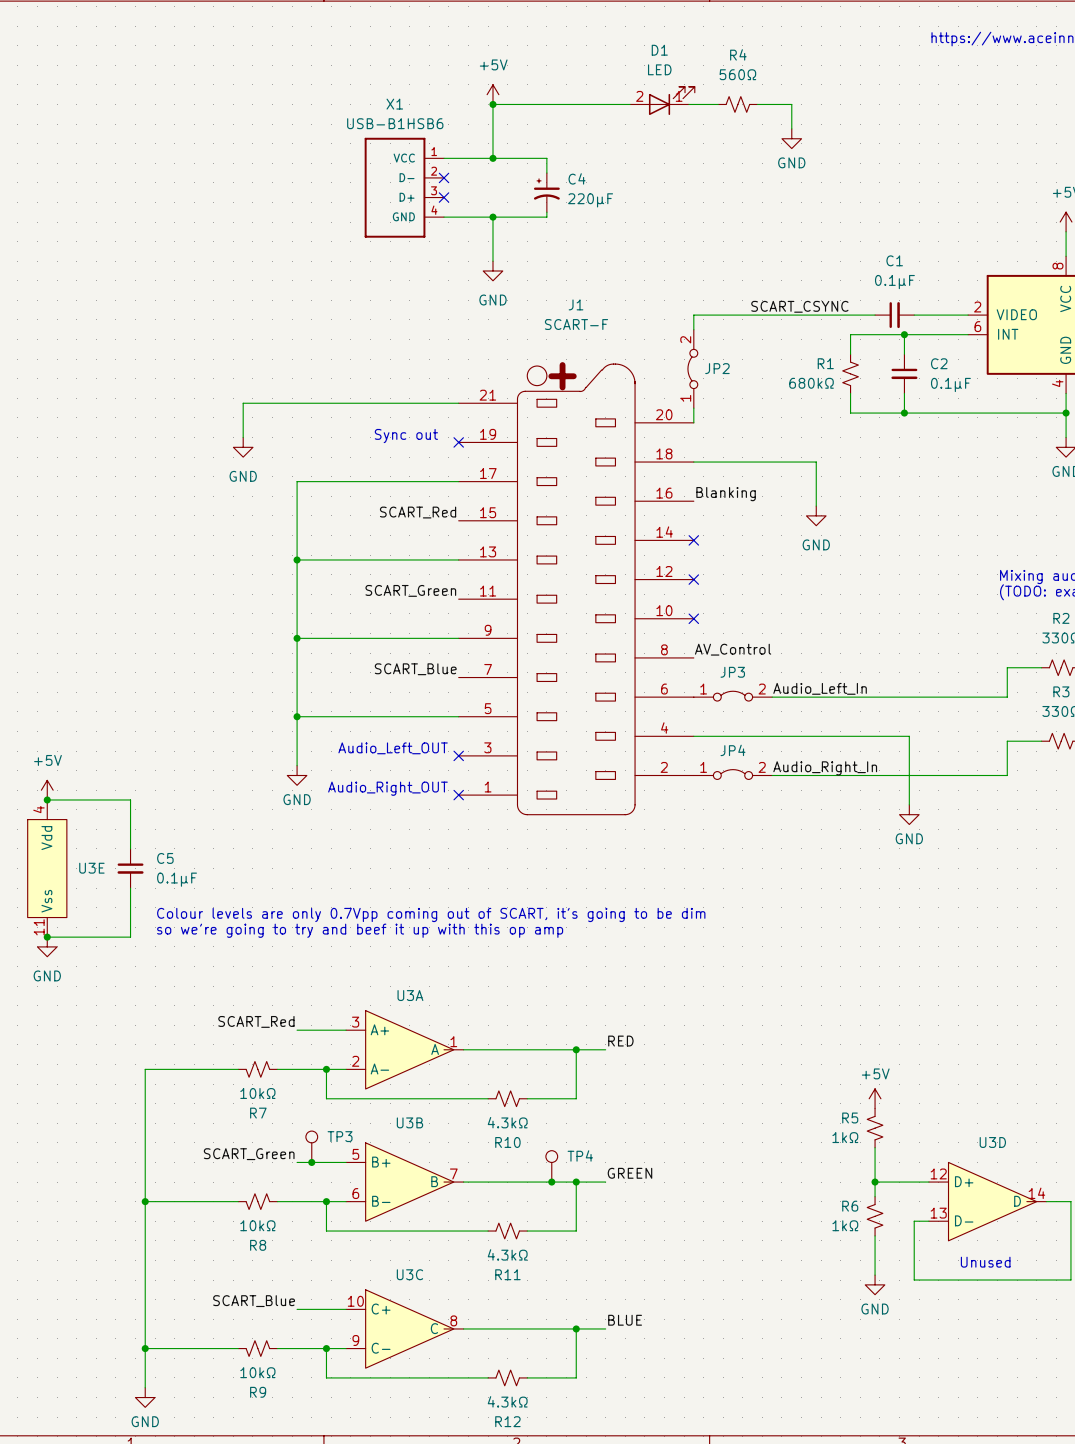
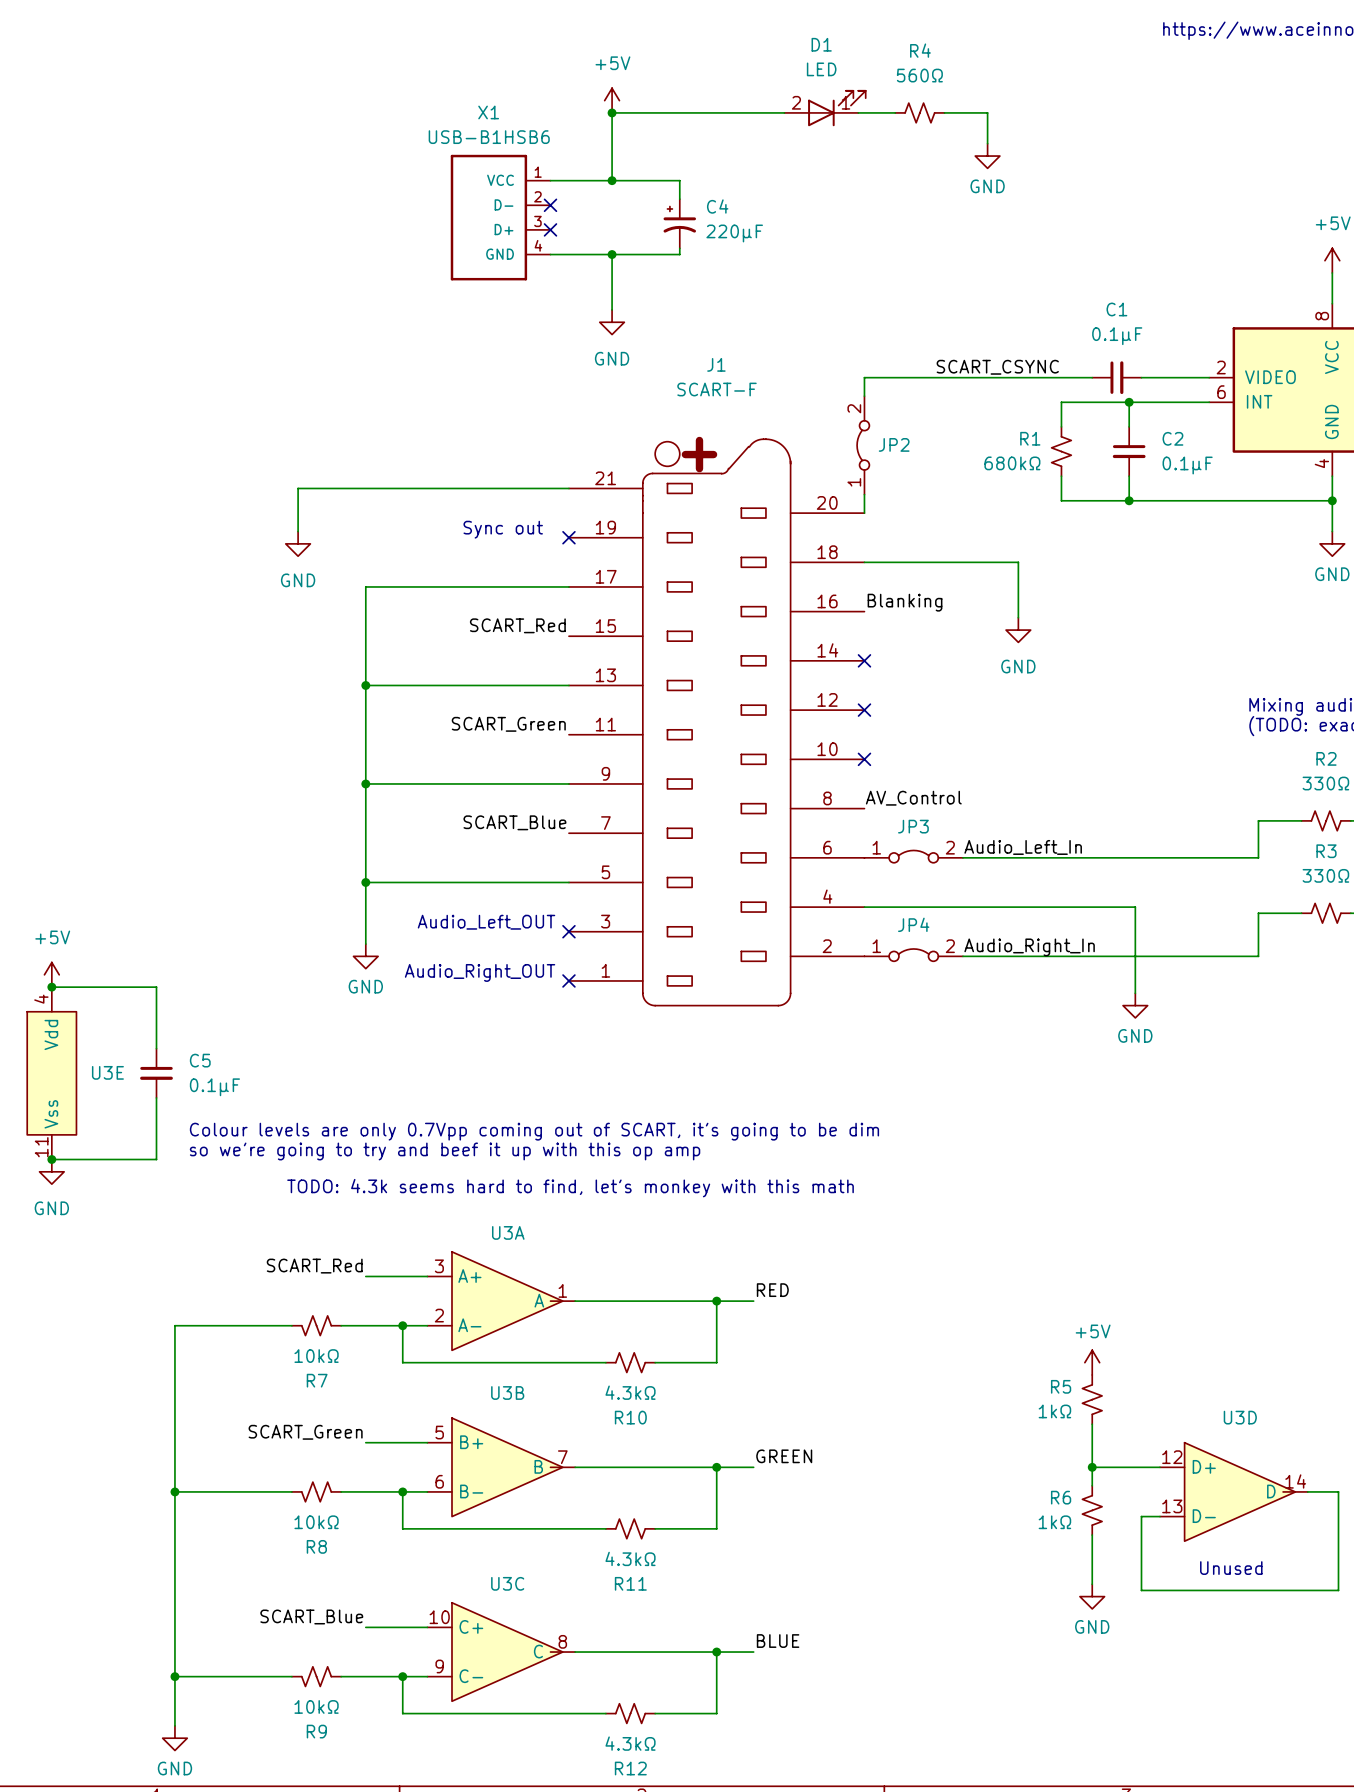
text: none -> TODO: 4.3k seems hard to find, let's monkey with this math (570, 1188)
TP3: (311, 1146) -> none
junction: (311, 1162) -> none
TP4: (551, 1166) -> none
junction: (551, 1182) -> none

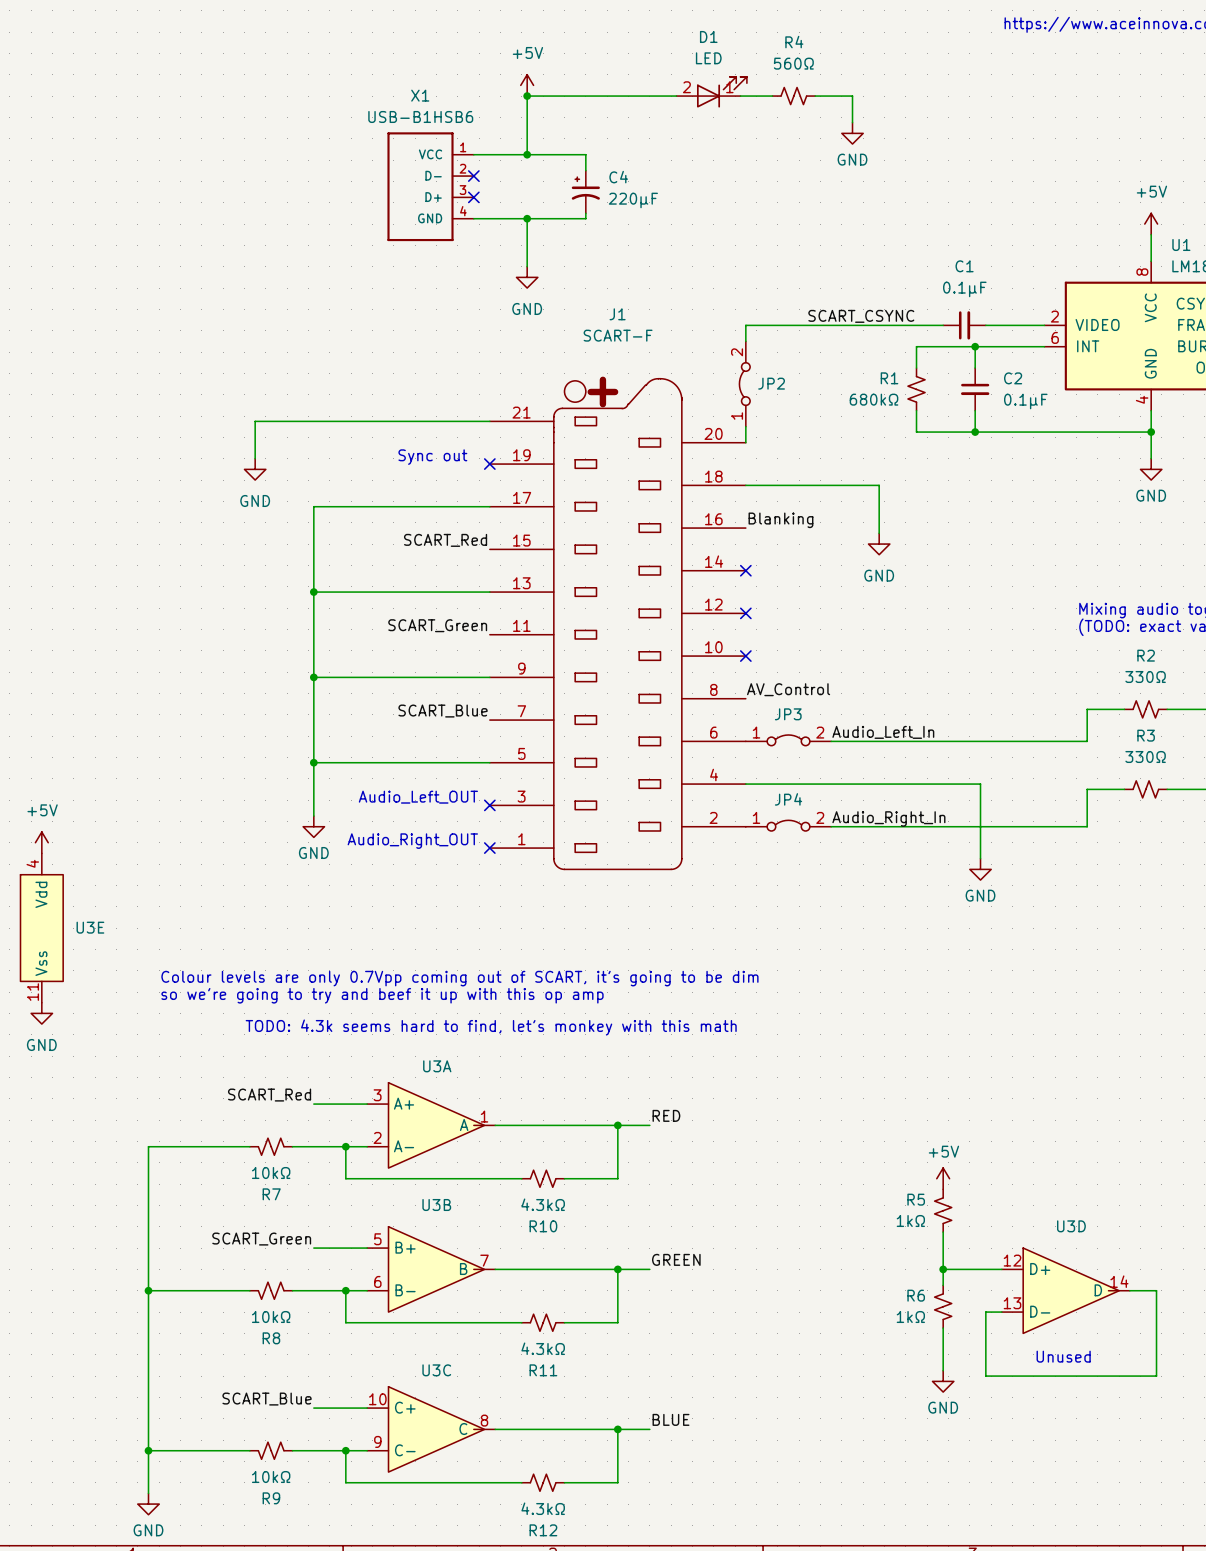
wire: (51, 987) (156, 987) (156, 1048) -> none
junction: (51, 987) -> none
C5: 0.1µF (156, 1073) -> none
wire: (156, 1097) (156, 1159) (51, 1159) -> none
junction: (51, 1159) -> none

